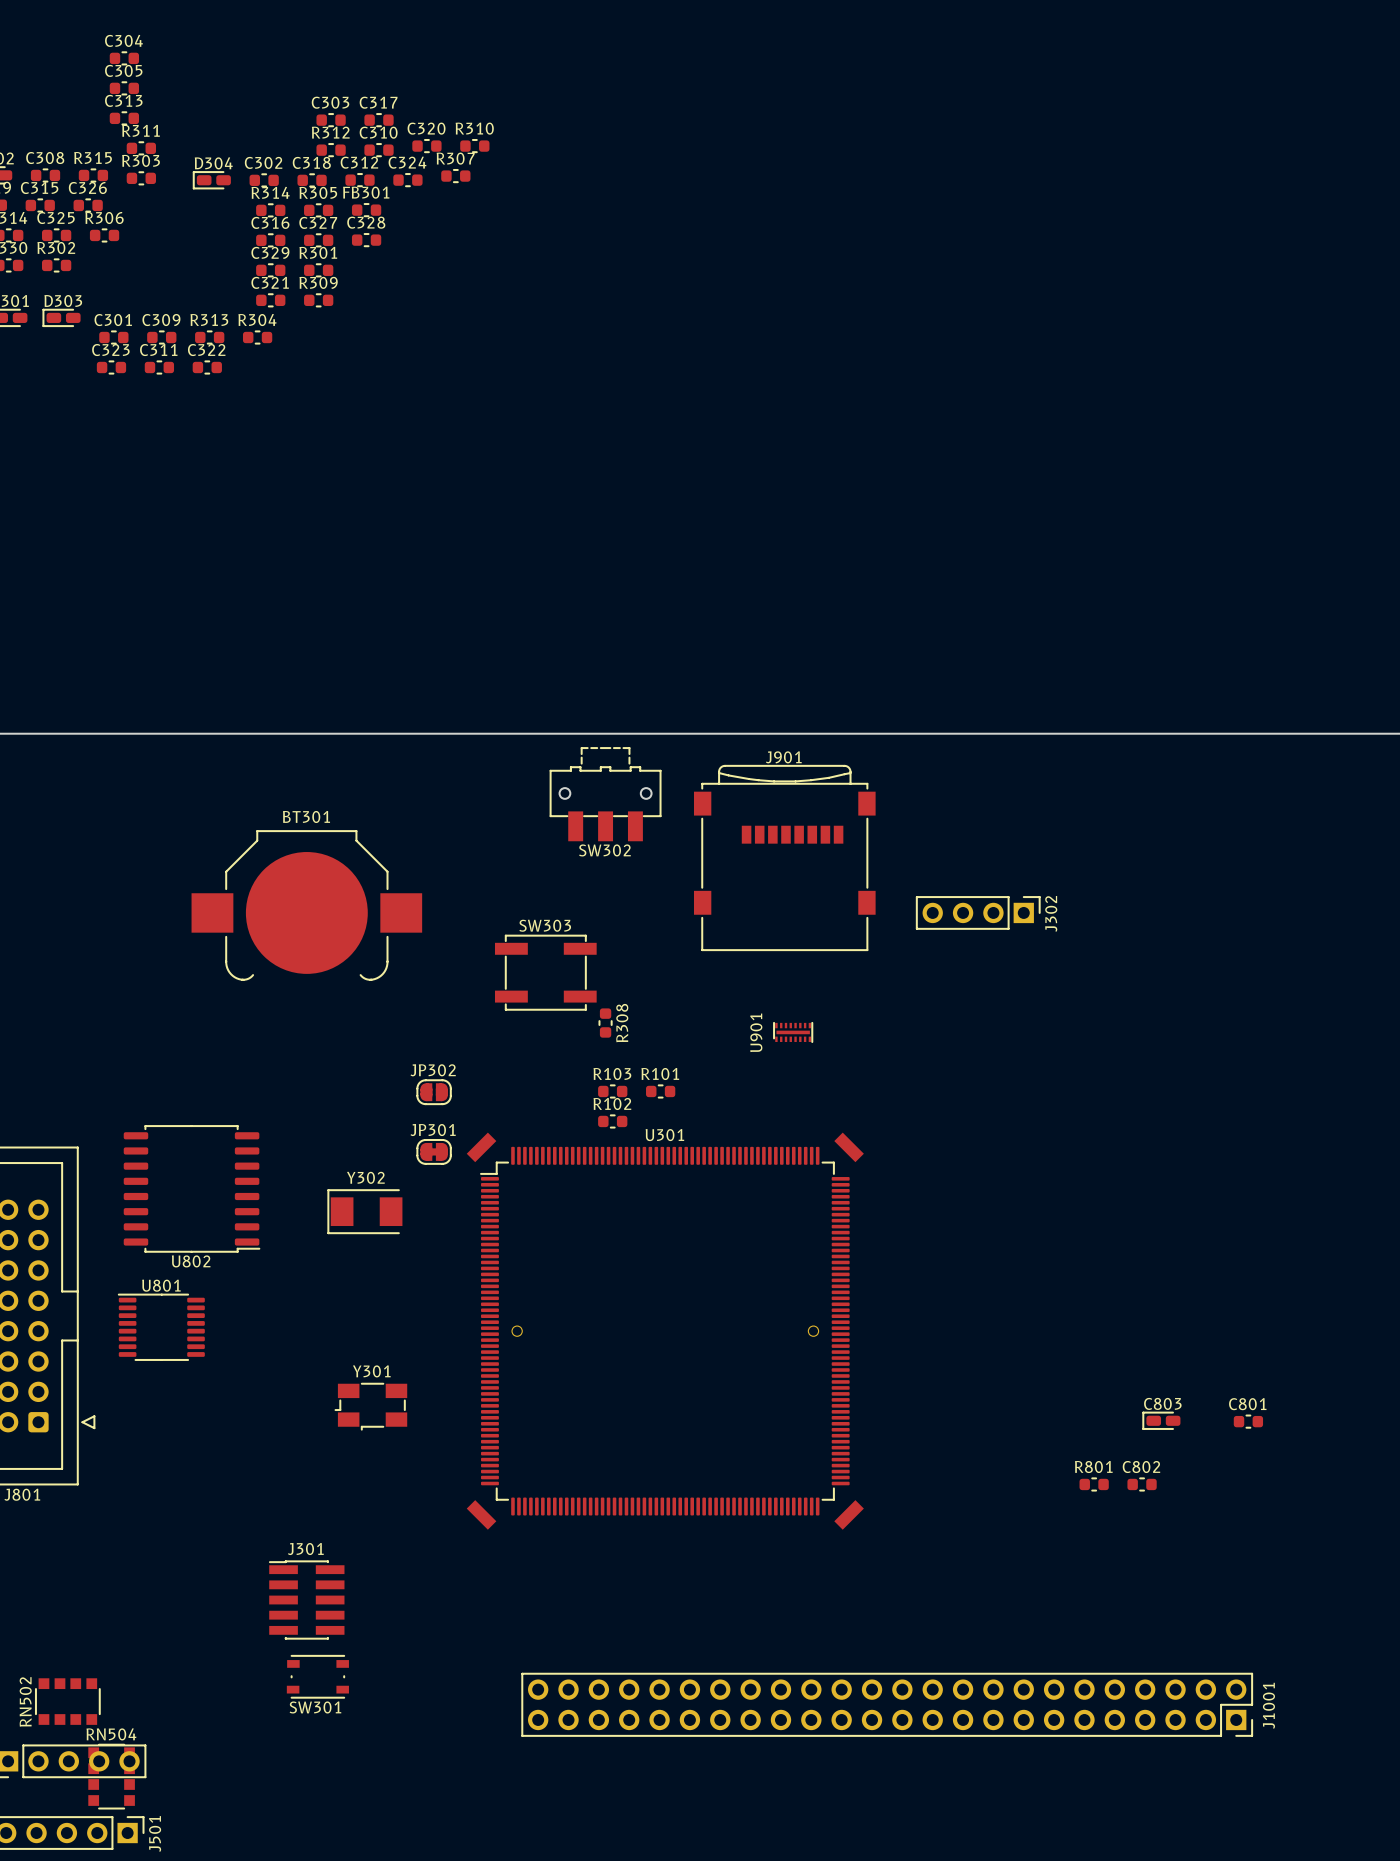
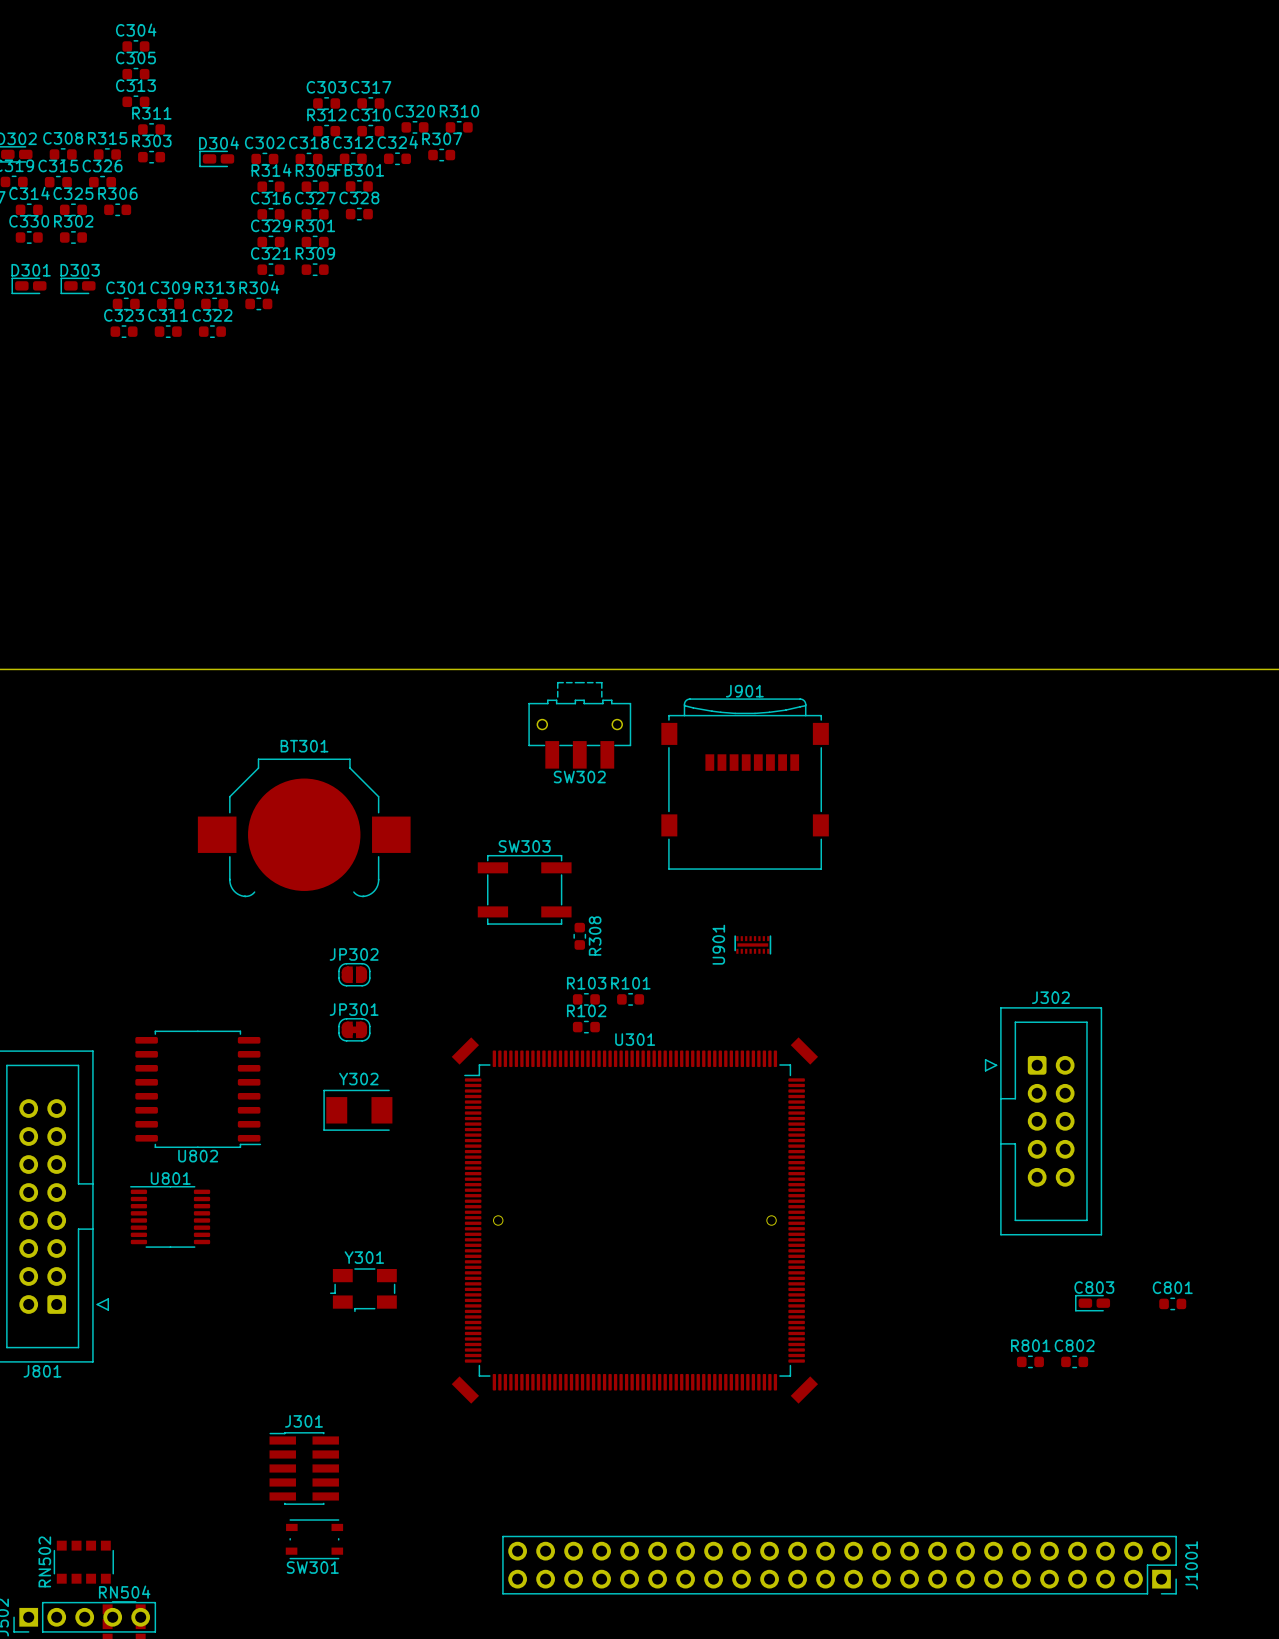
J302 footprint: [916, 896, 1041, 930] -> [984, 1007, 1103, 1236]
J302 name position: J302 (1051, 913) -> J302 (1050, 997)
JP302 position: (434, 1092) -> (354, 974)
JP301 position: (434, 1151) -> (354, 1029)

